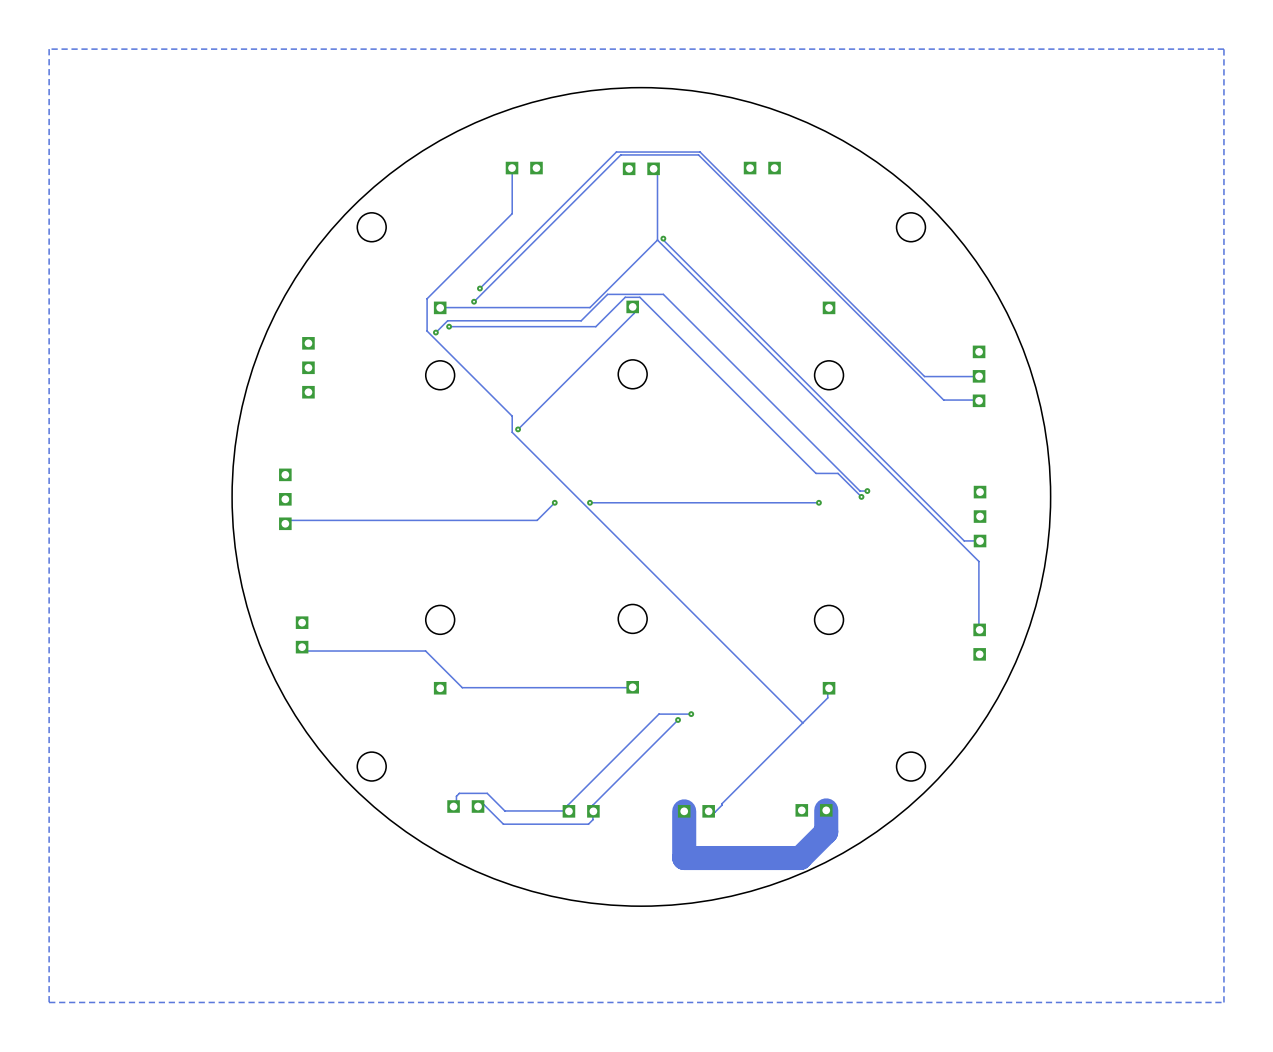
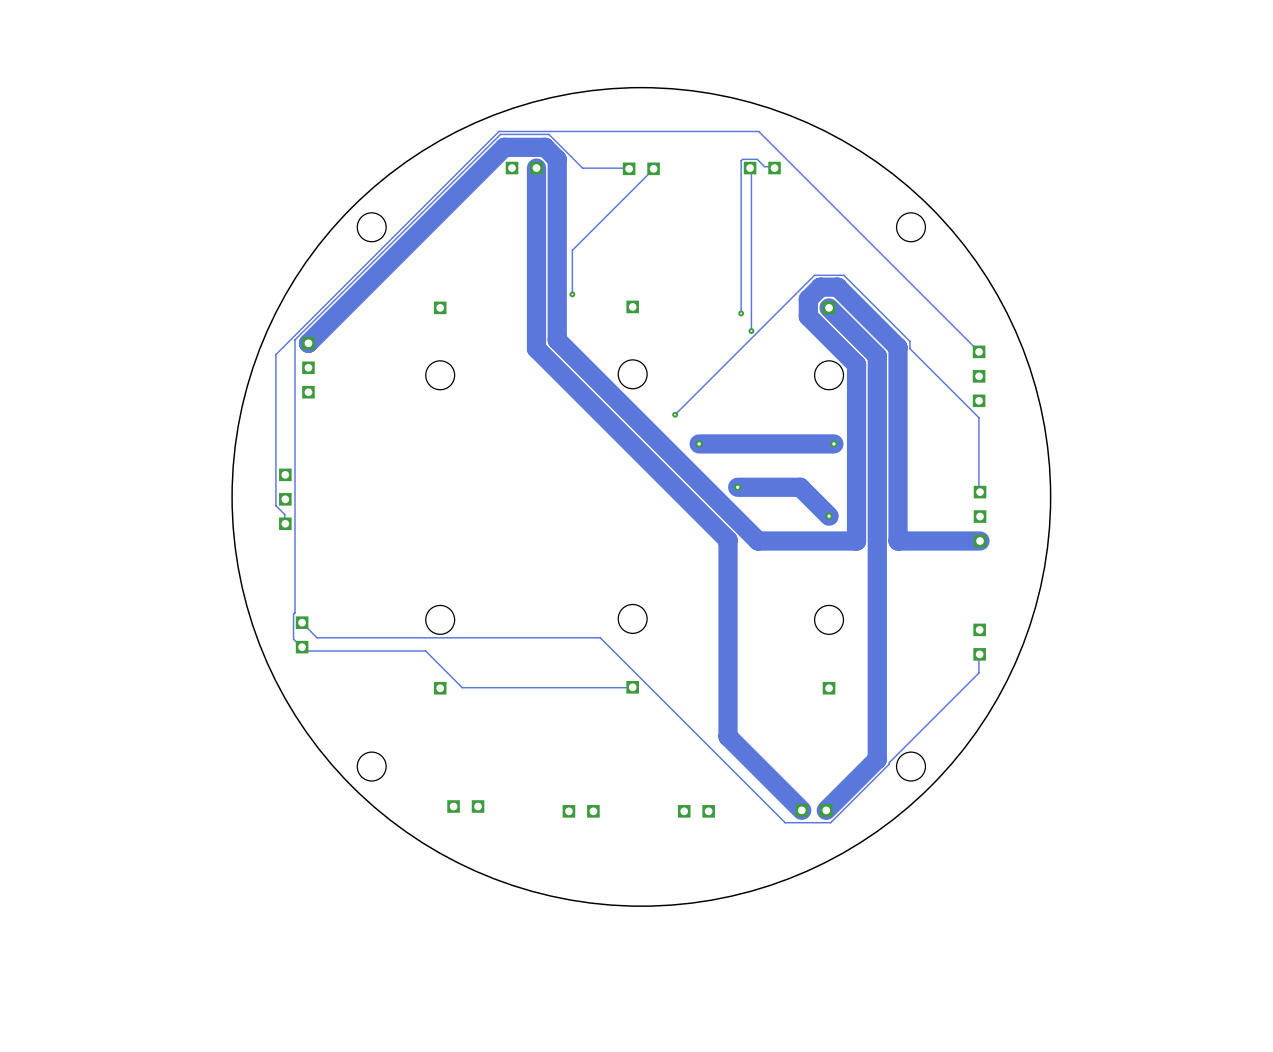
zone outline: (1223, 49) (49, 49) (49, 1002) (1223, 1002) (1223, 49) -> none
track: (512, 168) (512, 213) (427, 298) (427, 331) (512, 416) (512, 432) (802, 722) -> none
track: none -> (536, 168) (536, 348) (728, 540) (728, 736) (801, 810)
track: none -> (629, 168) (582, 168) (548, 134) (500, 134) (295, 339) (293, 639) (302, 647)
track: (653, 168) (657, 172) (657, 240) -> (653, 168) (572, 250) (572, 294)
track: none -> (750, 168) (751, 331)
track: none -> (774, 168) (764, 166) (757, 159) (741, 160) (741, 313)
track: (663, 238) (964, 540) (980, 541) -> (308, 343) (504, 147) (545, 147) (557, 159) (557, 340) (758, 541) (856, 541) (856, 364) (808, 316) (808, 299) (820, 287) (837, 287) (898, 347) (898, 541) (980, 541)
via: (663, 238) -> none
track: (657, 240) (978, 561) (979, 629) -> none
track: (657, 240) (589, 307) (440, 307) -> none
track: (479, 288) (616, 152) (700, 152) (924, 376) (979, 376) -> none
via: (479, 288) -> none
via: none -> (572, 294)
track: (474, 301) (620, 154) (698, 154) (943, 400) (979, 400) -> none
via: (474, 301) -> none
track: (632, 306) (634, 313) (518, 429) -> none
via: none -> (741, 313)
track: (449, 326) (595, 326) (625, 297) (639, 297) (816, 473) (838, 473) (861, 496) -> none
via: (449, 326) -> none
via: none -> (751, 331)
track: (435, 332) (447, 320) (581, 320) (607, 294) (663, 294) (860, 491) (867, 491) -> none
via: (435, 332) -> none
track: none -> (675, 414) (814, 275) (843, 275) (909, 341) (909, 348) (978, 417) (980, 492)
via: none -> (675, 414)
via: (518, 429) -> none
via: none -> (699, 443)
track: none -> (833, 443) (699, 443)
via: none -> (833, 443)
track: none -> (737, 487) (800, 487) (829, 516)
via: none -> (737, 487)
via: (867, 491) -> none
via: (861, 496) -> none
track: (554, 502) (537, 520) (289, 520) (285, 523) -> (979, 351) (758, 131) (499, 131) (275, 354) (275, 505) (284, 514) (285, 523)
via: (554, 502) -> none
via: (589, 502) -> none
track: (818, 502) (589, 502) -> none
via: (818, 502) -> none
via: none -> (829, 516)
track: none -> (302, 622) (317, 637) (600, 637) (785, 822) (830, 822) (978, 673) (979, 654)
track: (829, 688) (827, 697) (714, 812) (708, 811) -> none
track: (691, 714) (658, 714) (567, 805) (567, 810) -> none
via: (691, 714) -> none
track: (678, 719) (592, 805) (592, 819) (588, 824) (503, 824) (484, 805) (478, 806) -> none
via: (678, 719) -> none
track: (453, 806) (456, 803) (456, 796) (459, 793) (487, 793) (504, 810) (567, 810) -> none
track: (826, 810) (826, 832) (800, 858) (684, 858) (684, 811) -> (826, 810) (877, 759) (877, 356) (829, 307)

